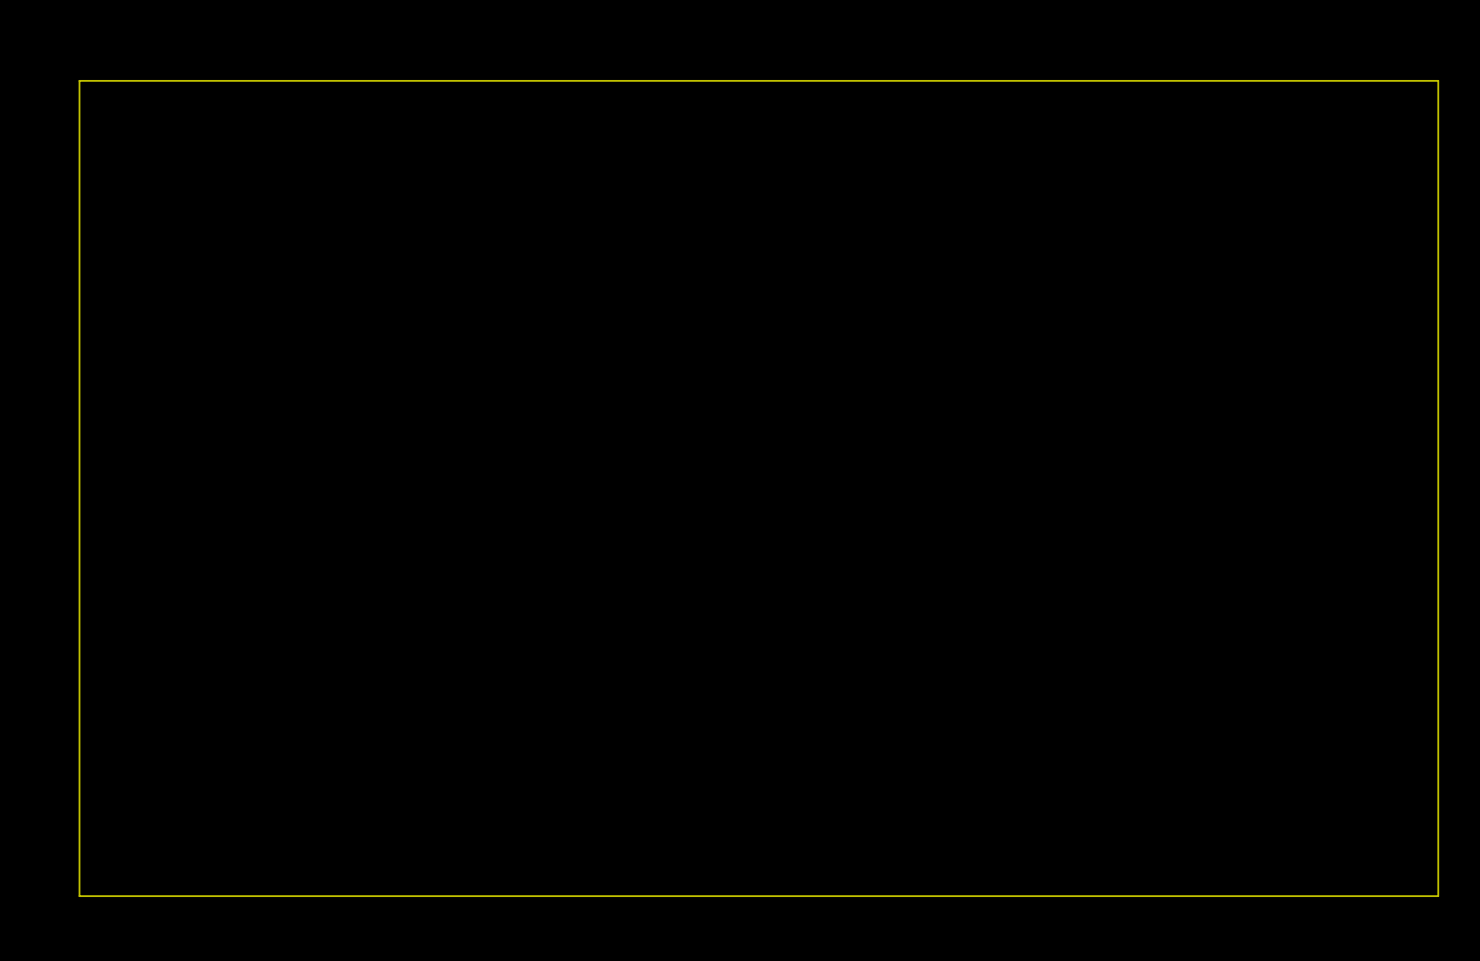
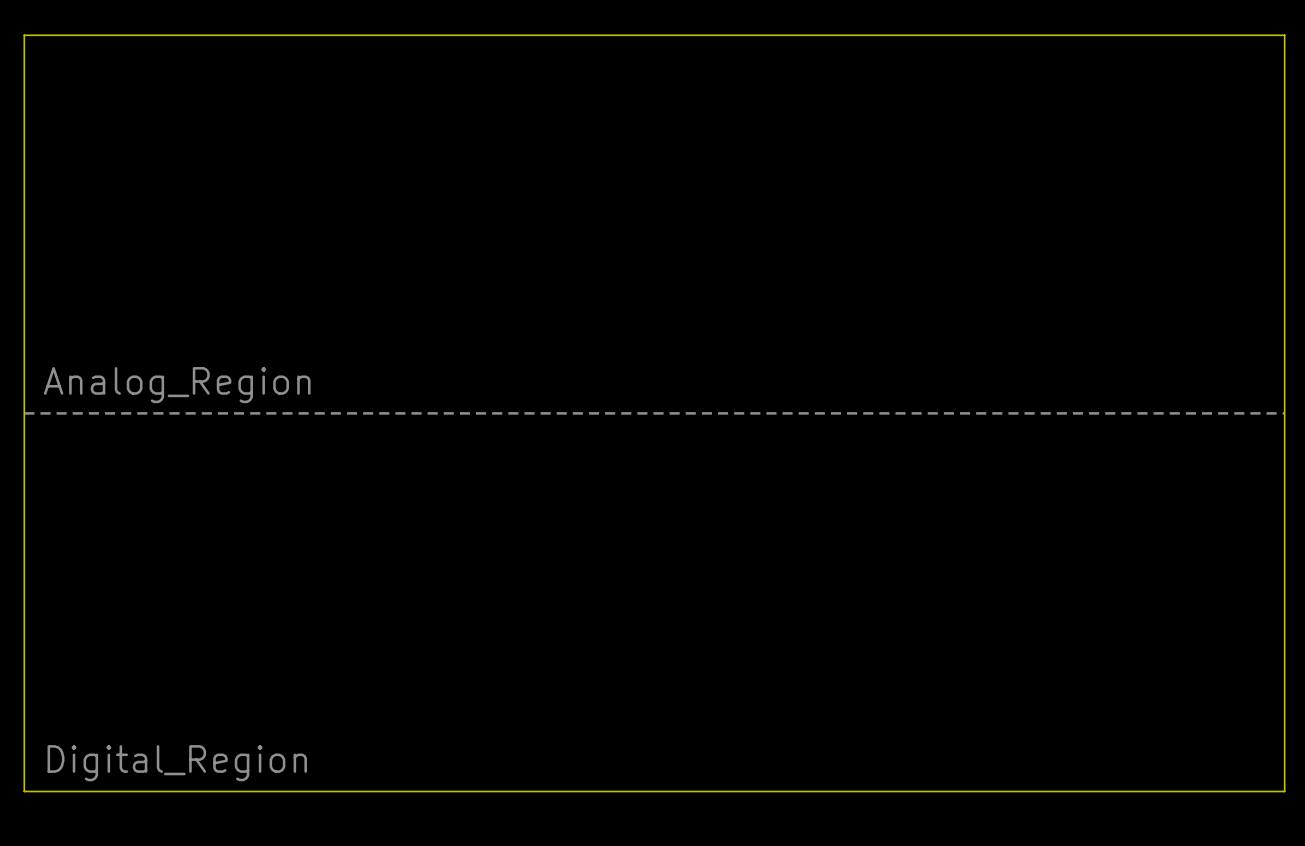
text: none -> Analog_Region (177, 385)
line: none -> (24, 413) (1284, 413)
text: none -> Digital_Region (177, 763)

